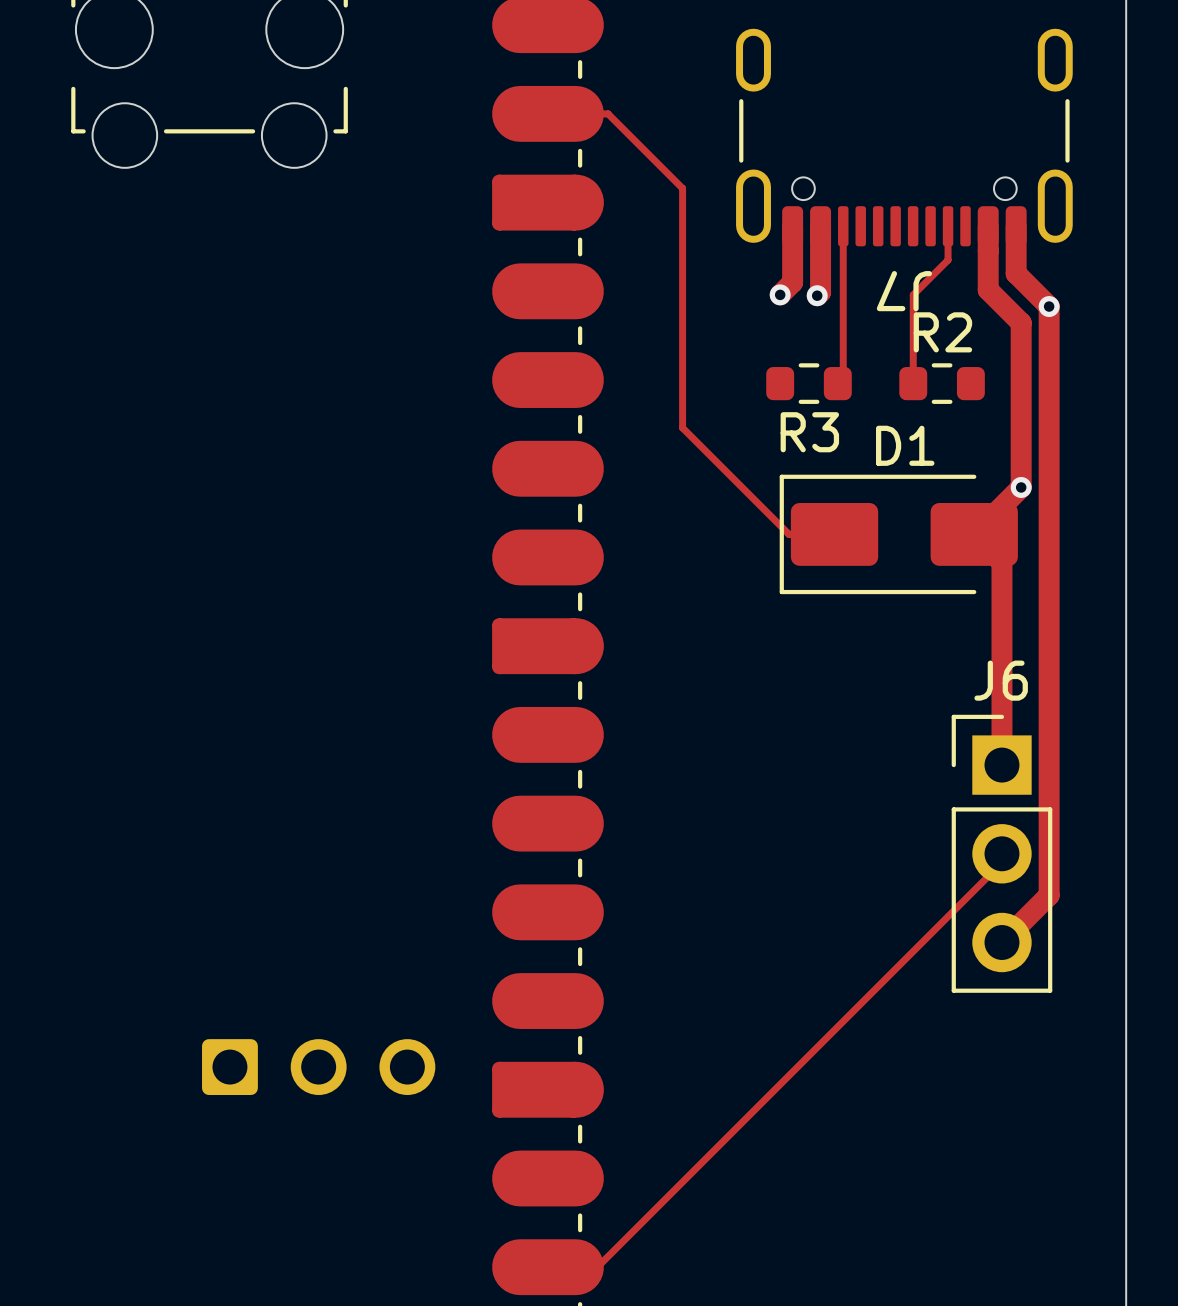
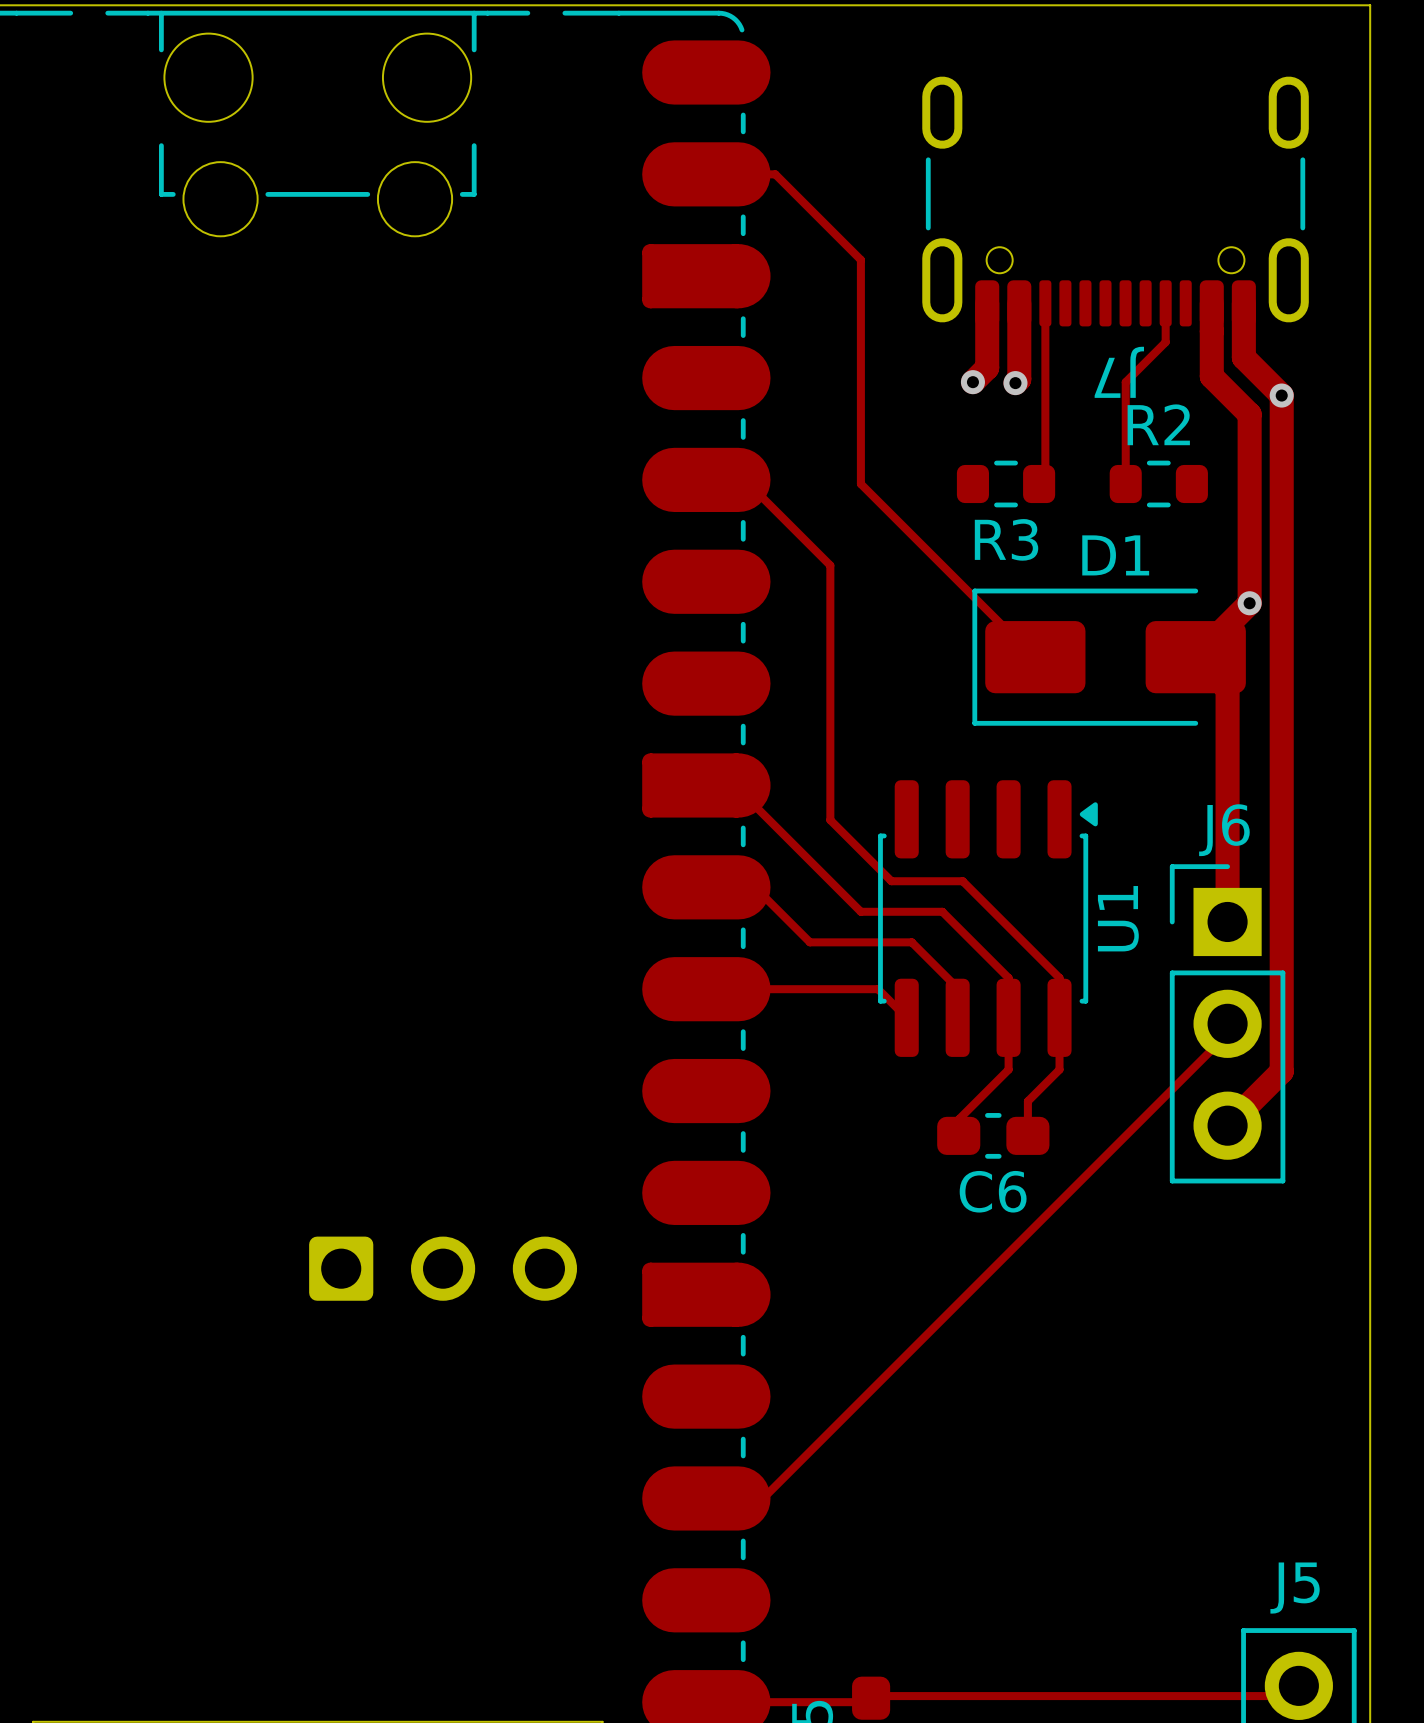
track: none -> (706, 479) (744, 479) (830, 565) (830, 820) (891, 881) (962, 881) (1059, 978) (1059, 1069) (1027, 1101) (1027, 1135)
track: (682, 383) (682, 427) (789, 534) (833, 534) -> (860, 484) (1034, 657)
track: none -> (706, 785) (734, 785) (860, 911) (942, 911) (1008, 978) (1008, 1069) (958, 1119) (958, 1135)
track: none -> (706, 887) (754, 887) (809, 942) (911, 942) (957, 988) (957, 1017)
U1: none -> (987, 918)
track: none -> (706, 989) (878, 989) (906, 1017)
C6: none -> (993, 1135)

